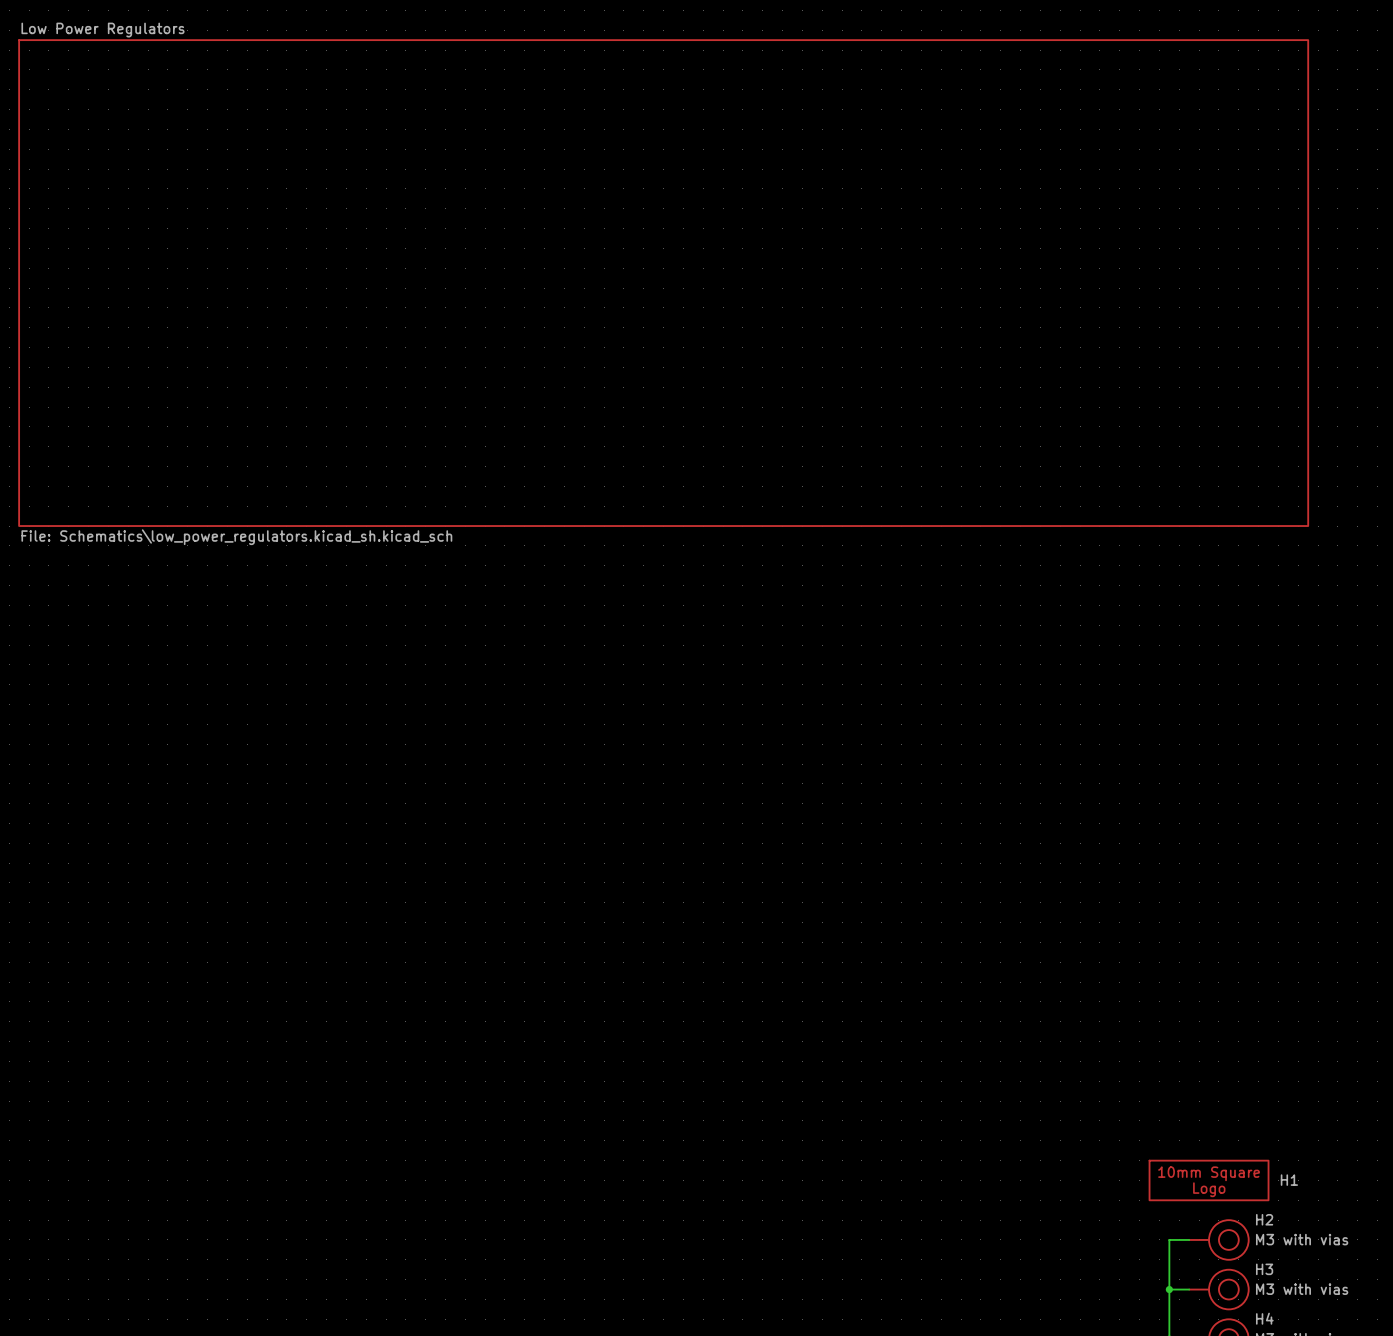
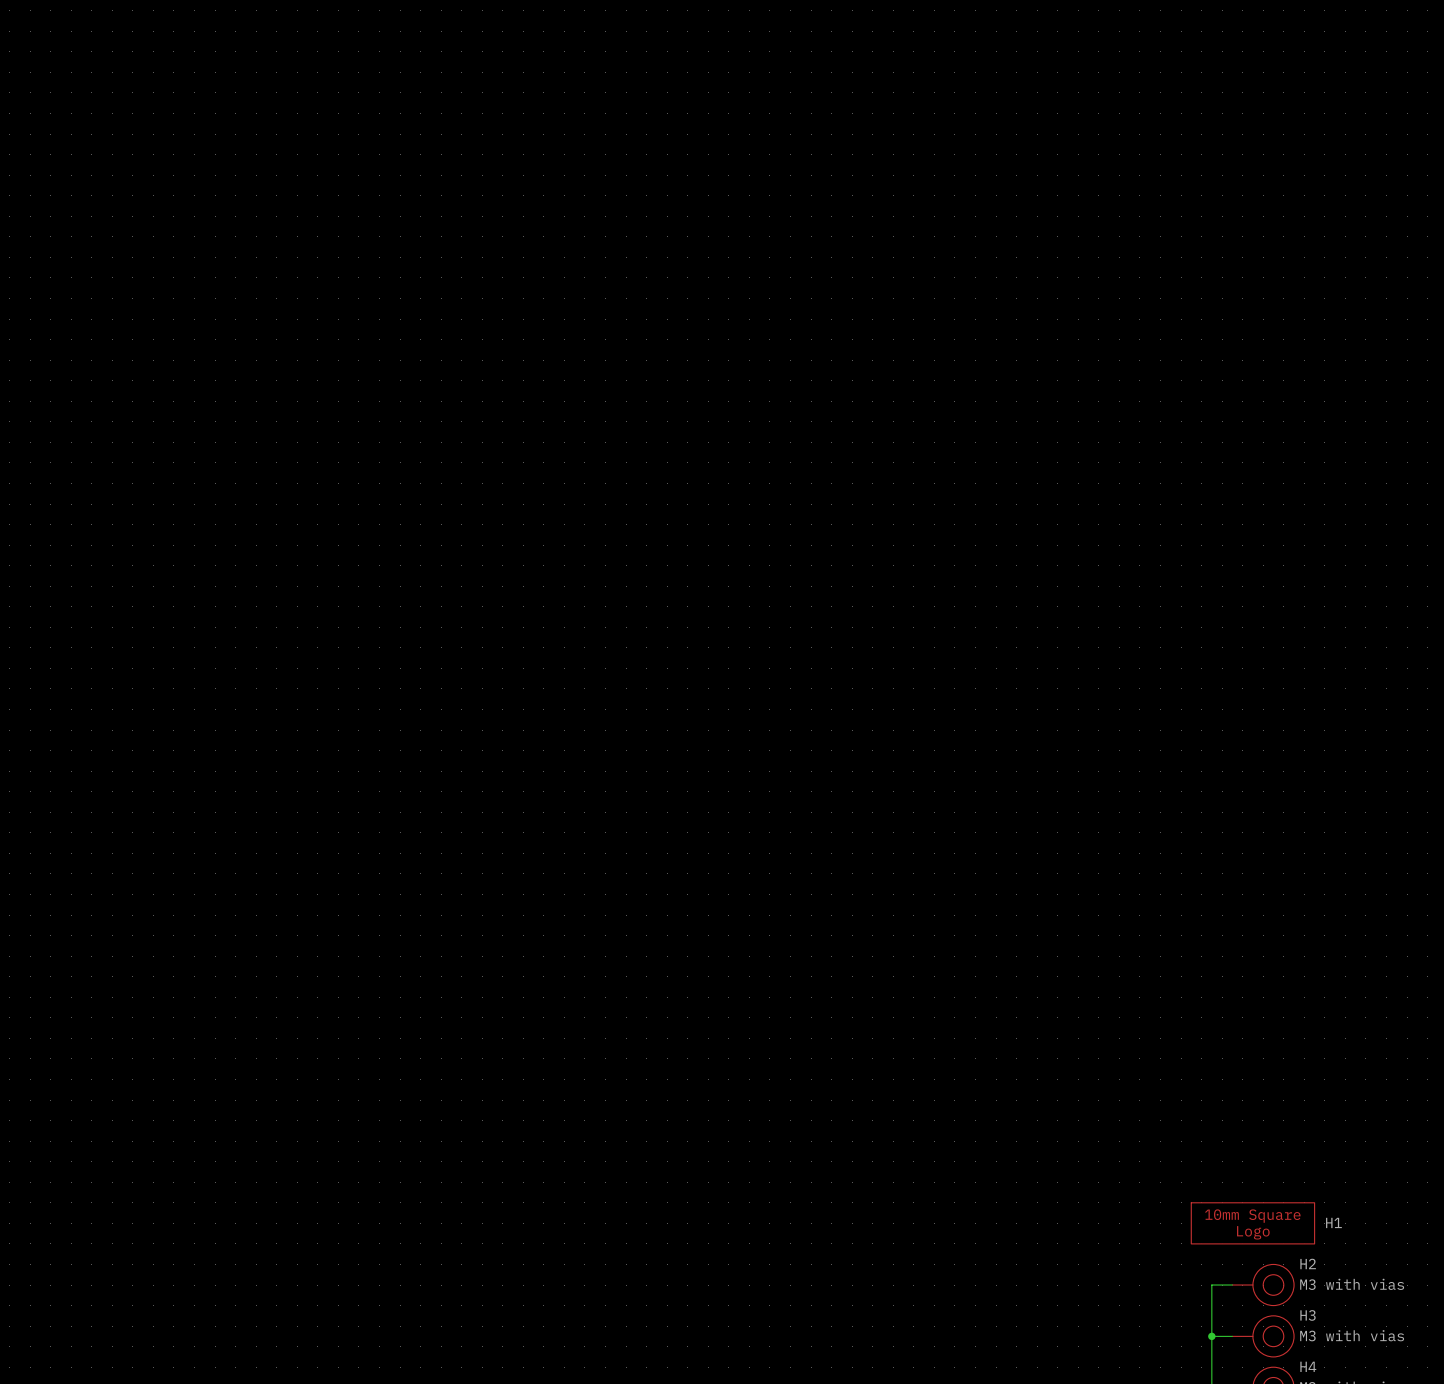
sheet Low Power Regulators: File: Schematics\low_power_regulators.kicad_sh.kicad_sch (663, 283) -> none

